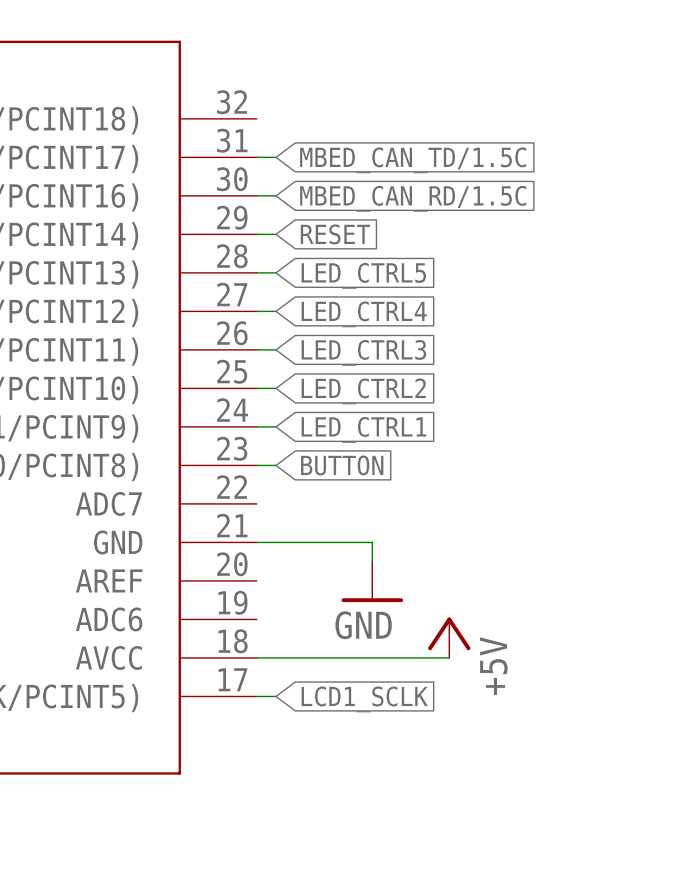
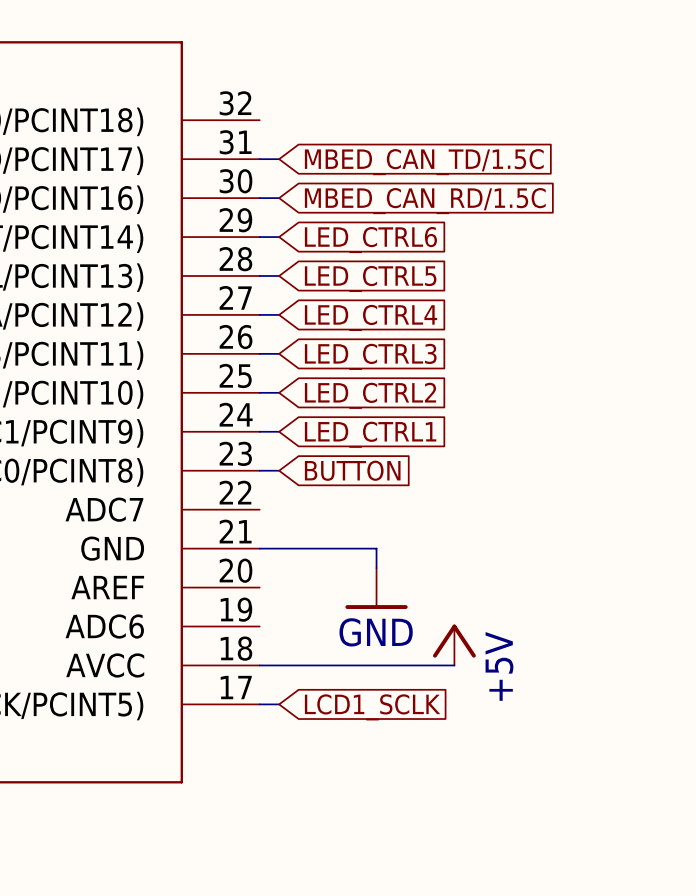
global label: RESET (335, 234) -> LED_CTRL6 (370, 240)

